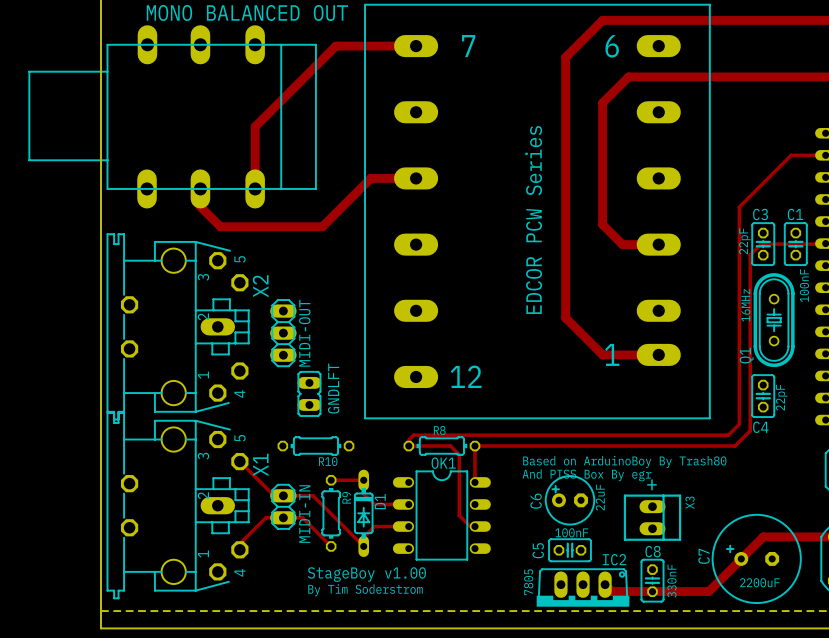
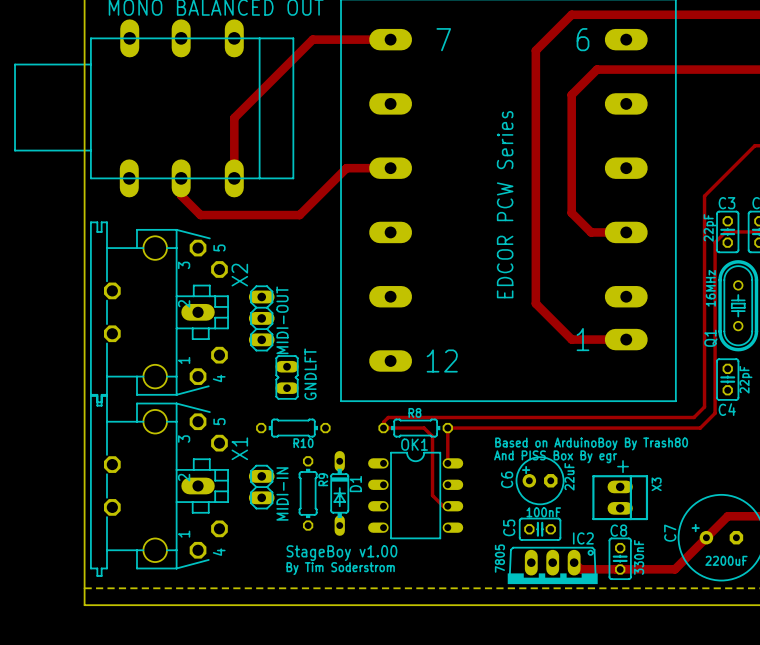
track: (239, 461) (274, 495) (313, 495) (363, 546) (363, 537) (374, 526) (408, 526) -> none
track: (331, 480) (363, 480) (363, 493) (374, 504) (408, 504) -> none
track: (331, 546) (302, 517) (266, 517) (239, 543) (239, 549) -> none

